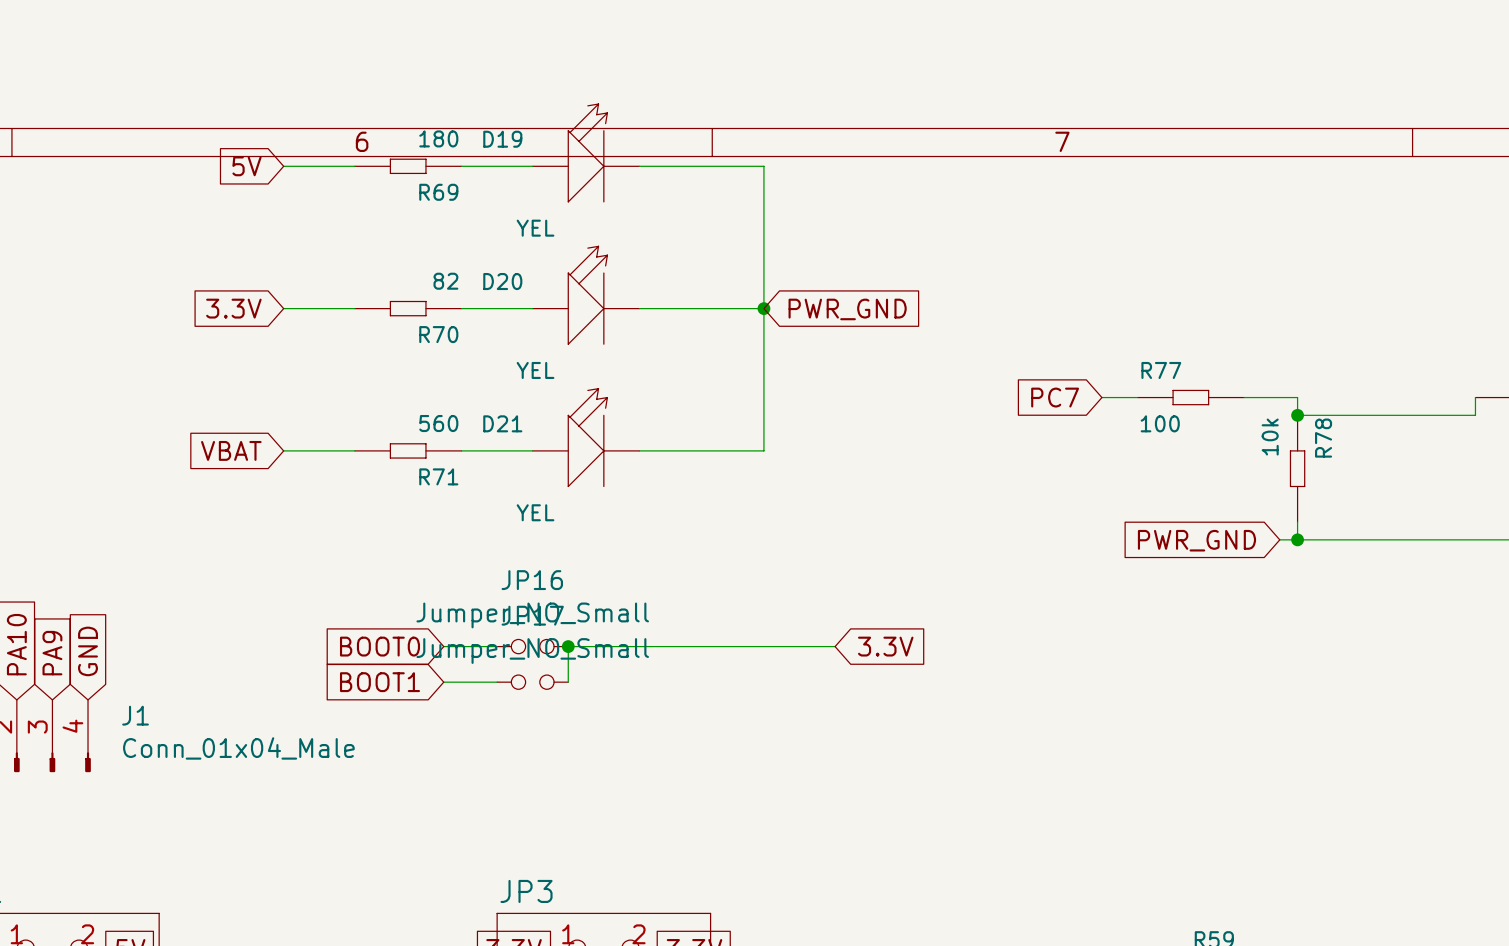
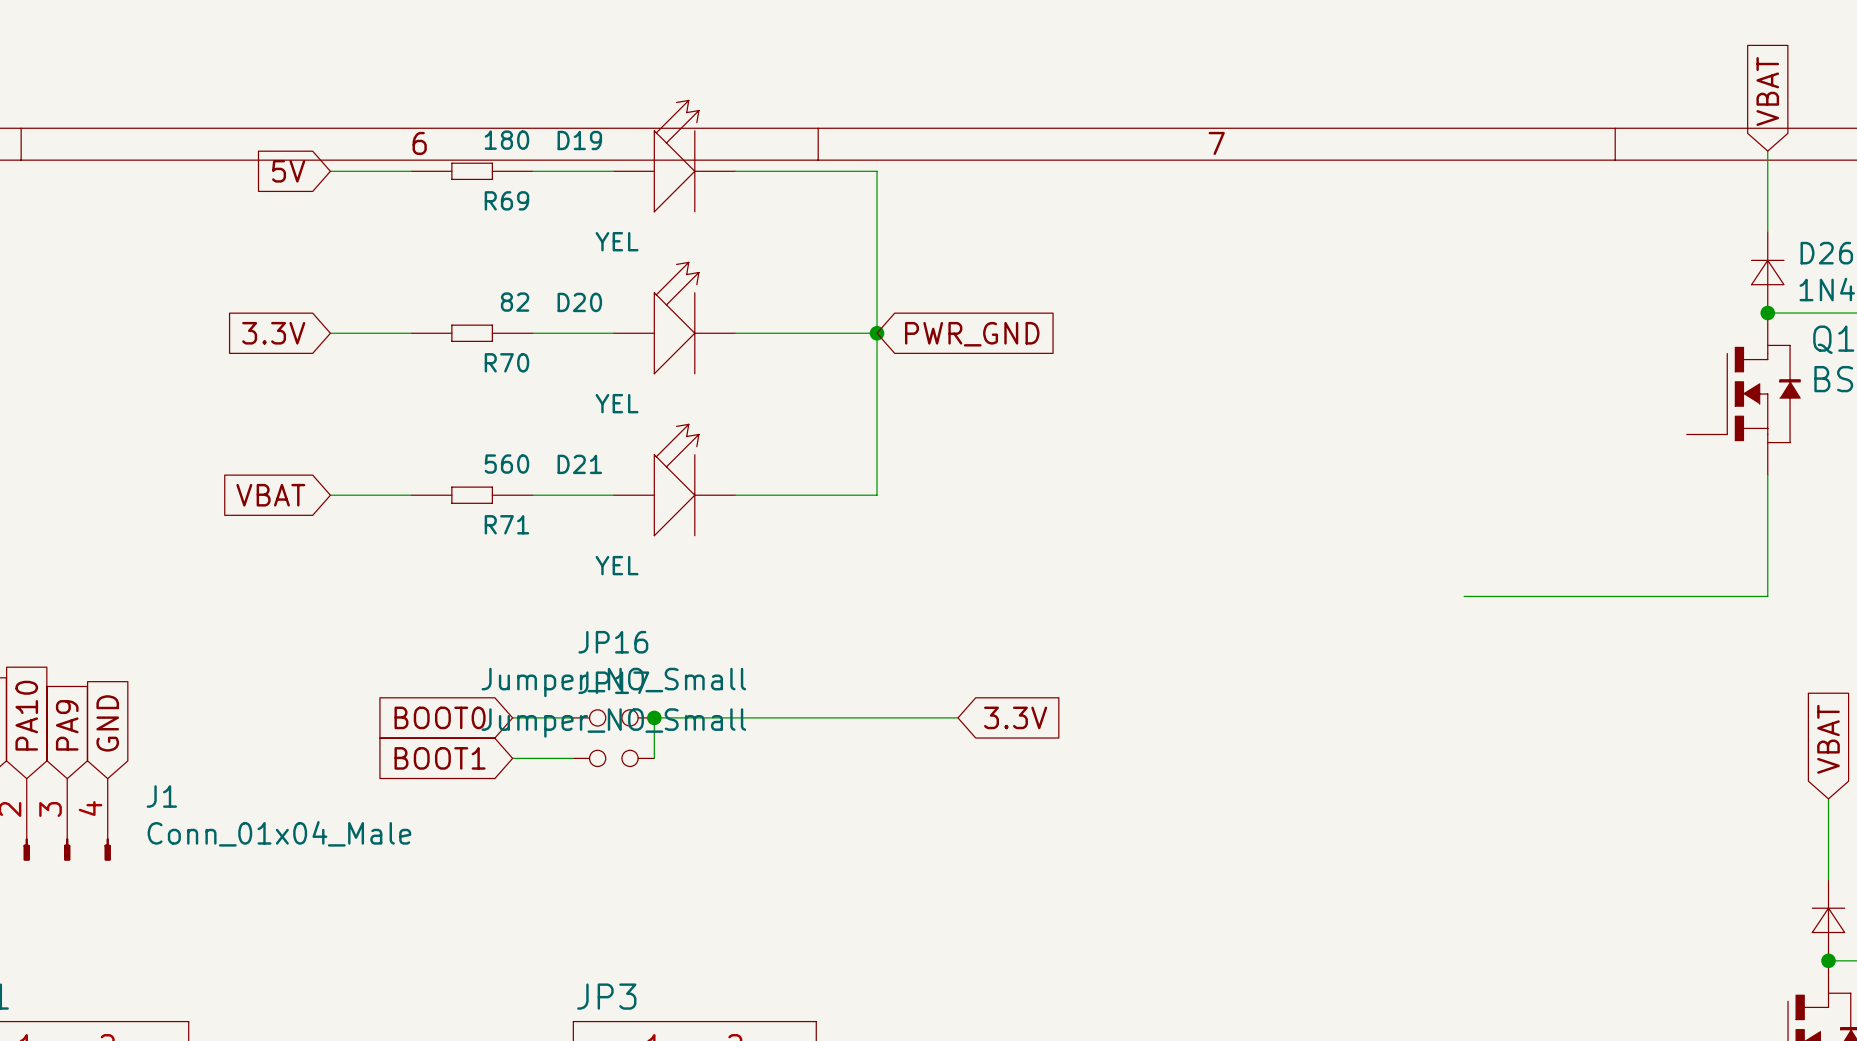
global label: PC7 (1055, 397) -> none
wire: (1101, 397) (1137, 397) -> none
R77: 100 (1190, 397) -> none
wire: (1244, 397) (1297, 397) (1297, 415) (1475, 415) (1475, 397) -> none
junction: (1297, 415) -> none
R78: 10k (1297, 468) -> none
wire: (1297, 522) (1297, 539) -> none
junction: (1297, 539) -> none
global label: PWR_GND (1196, 540) -> none

